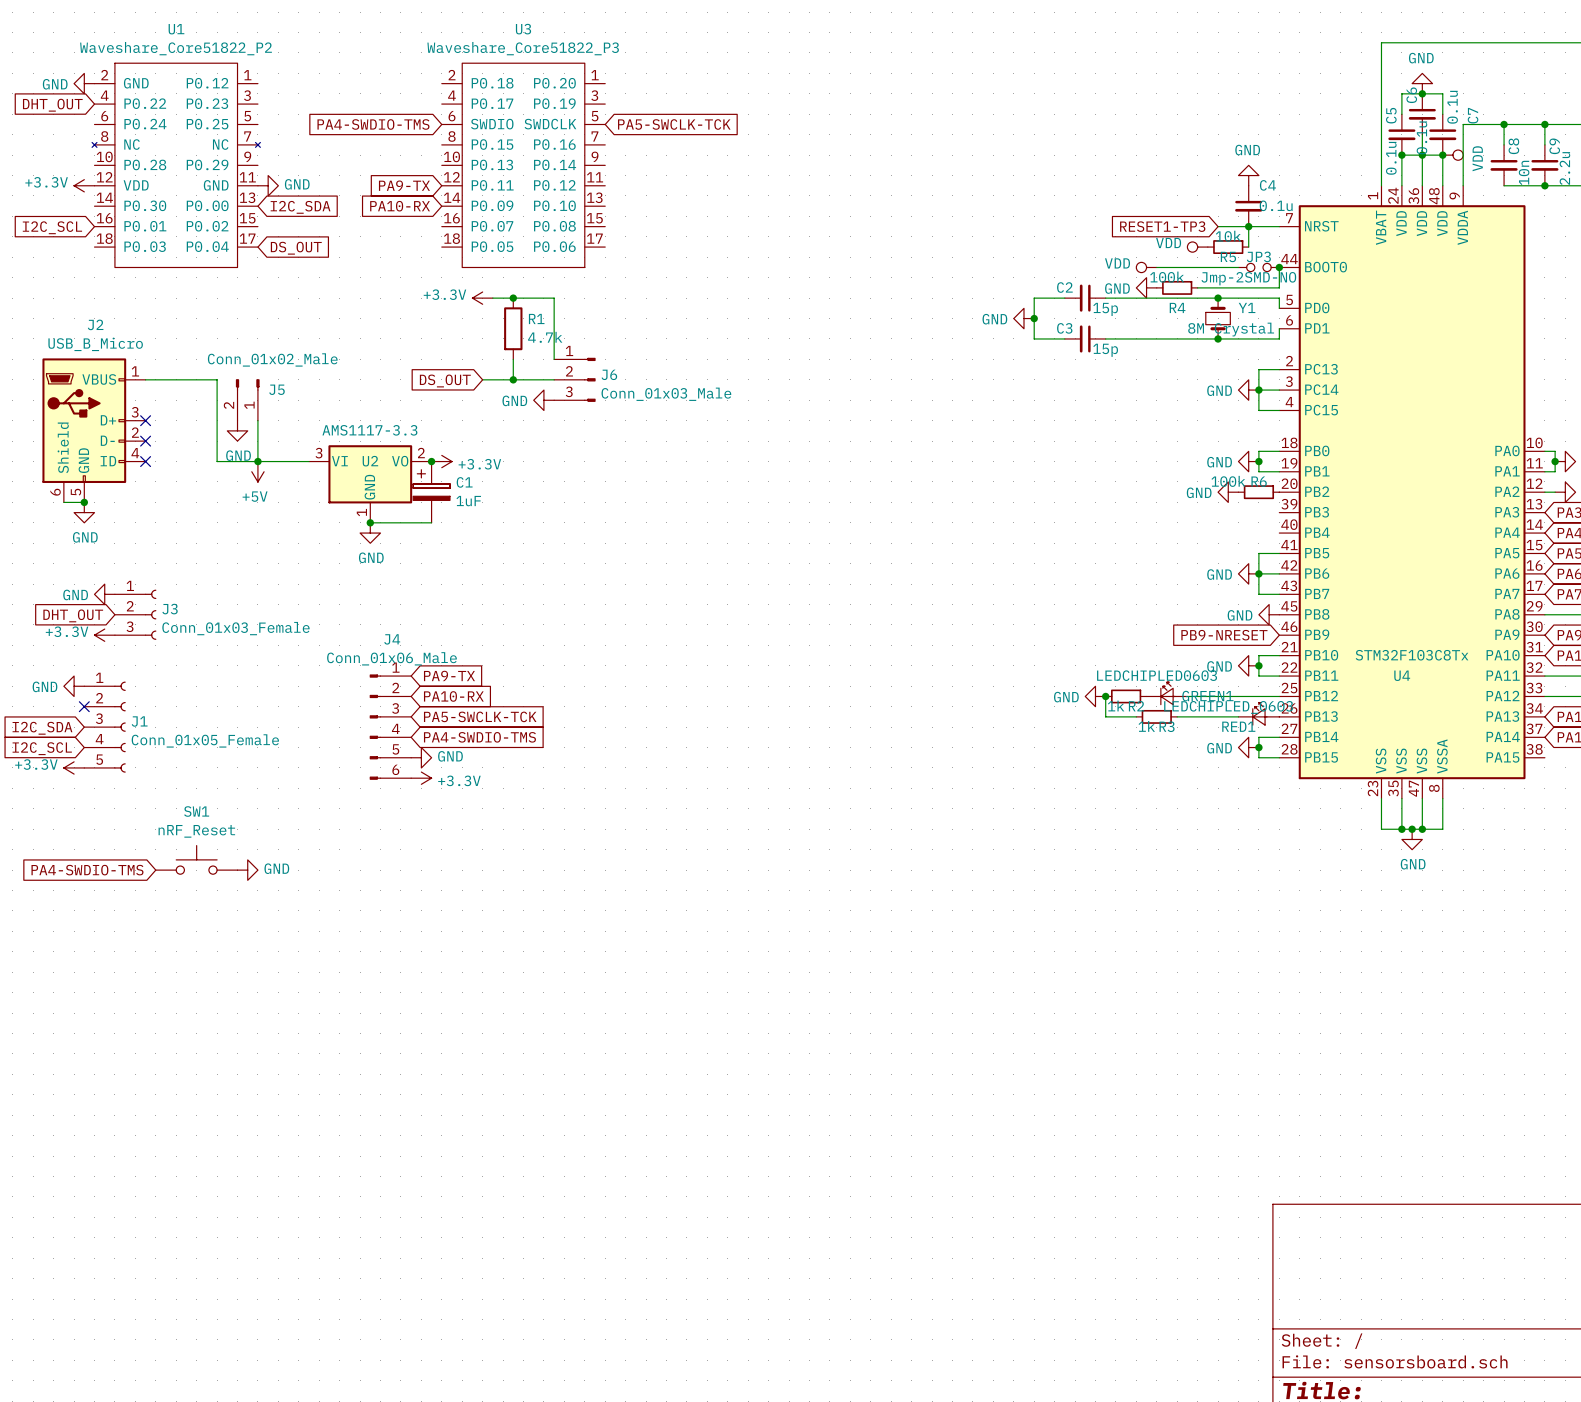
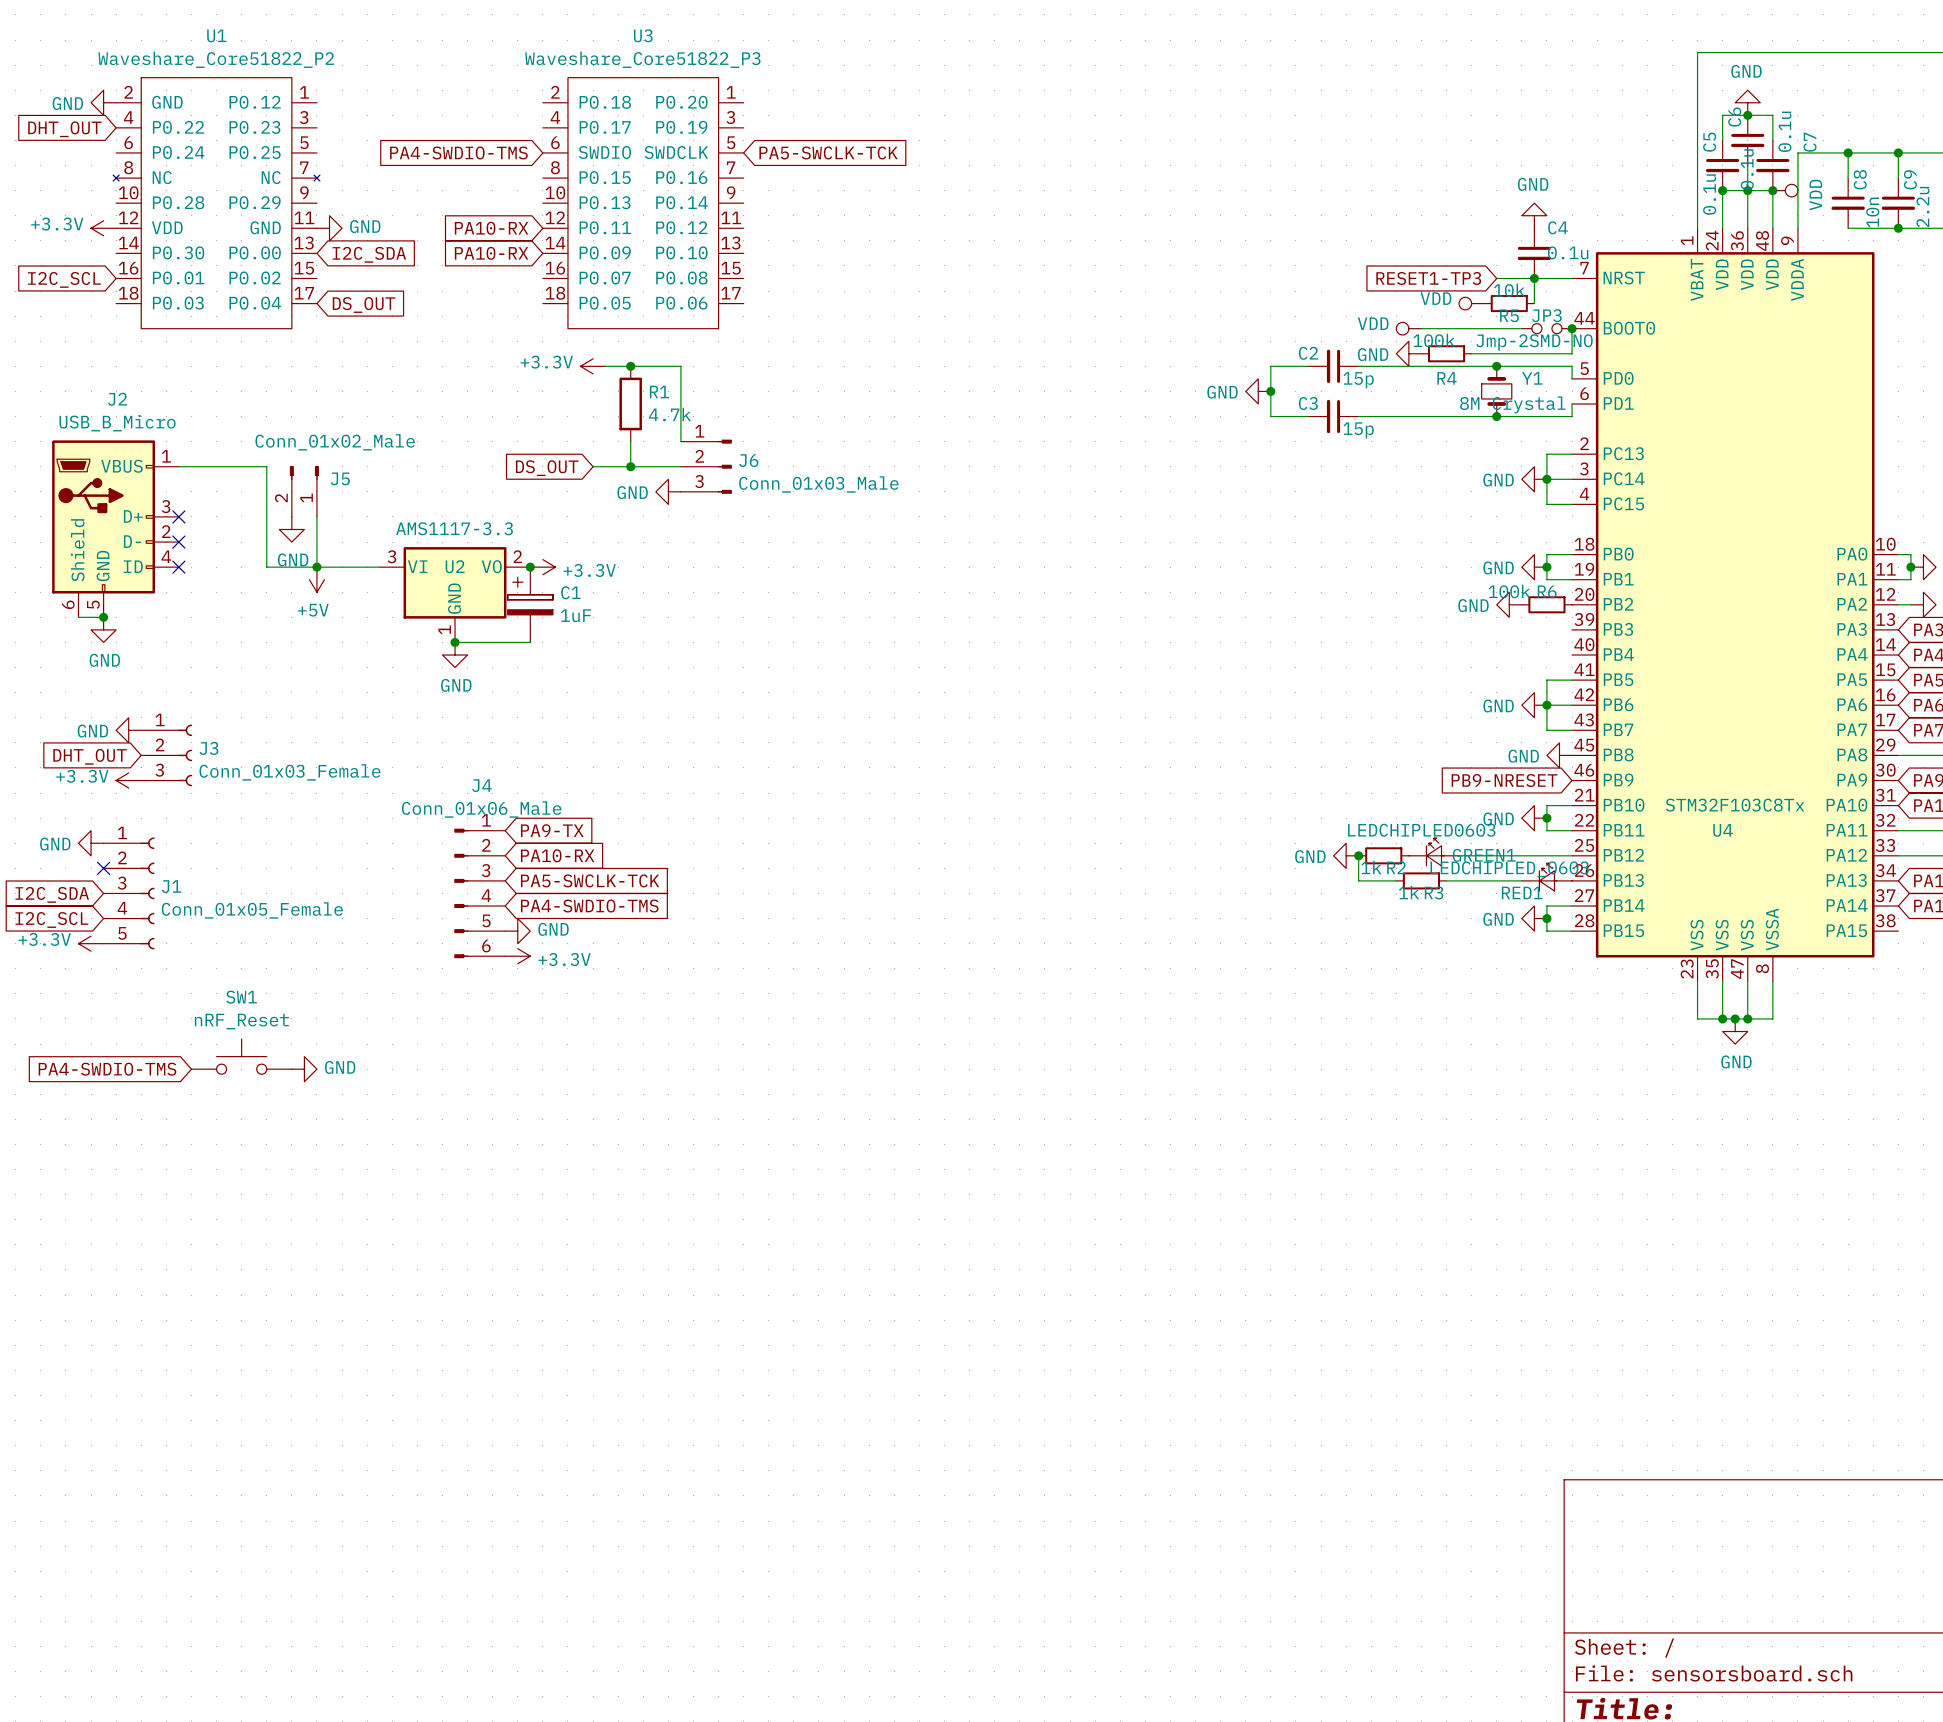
global label: PA9-TX (404, 185) -> PA10-RX (491, 228)

